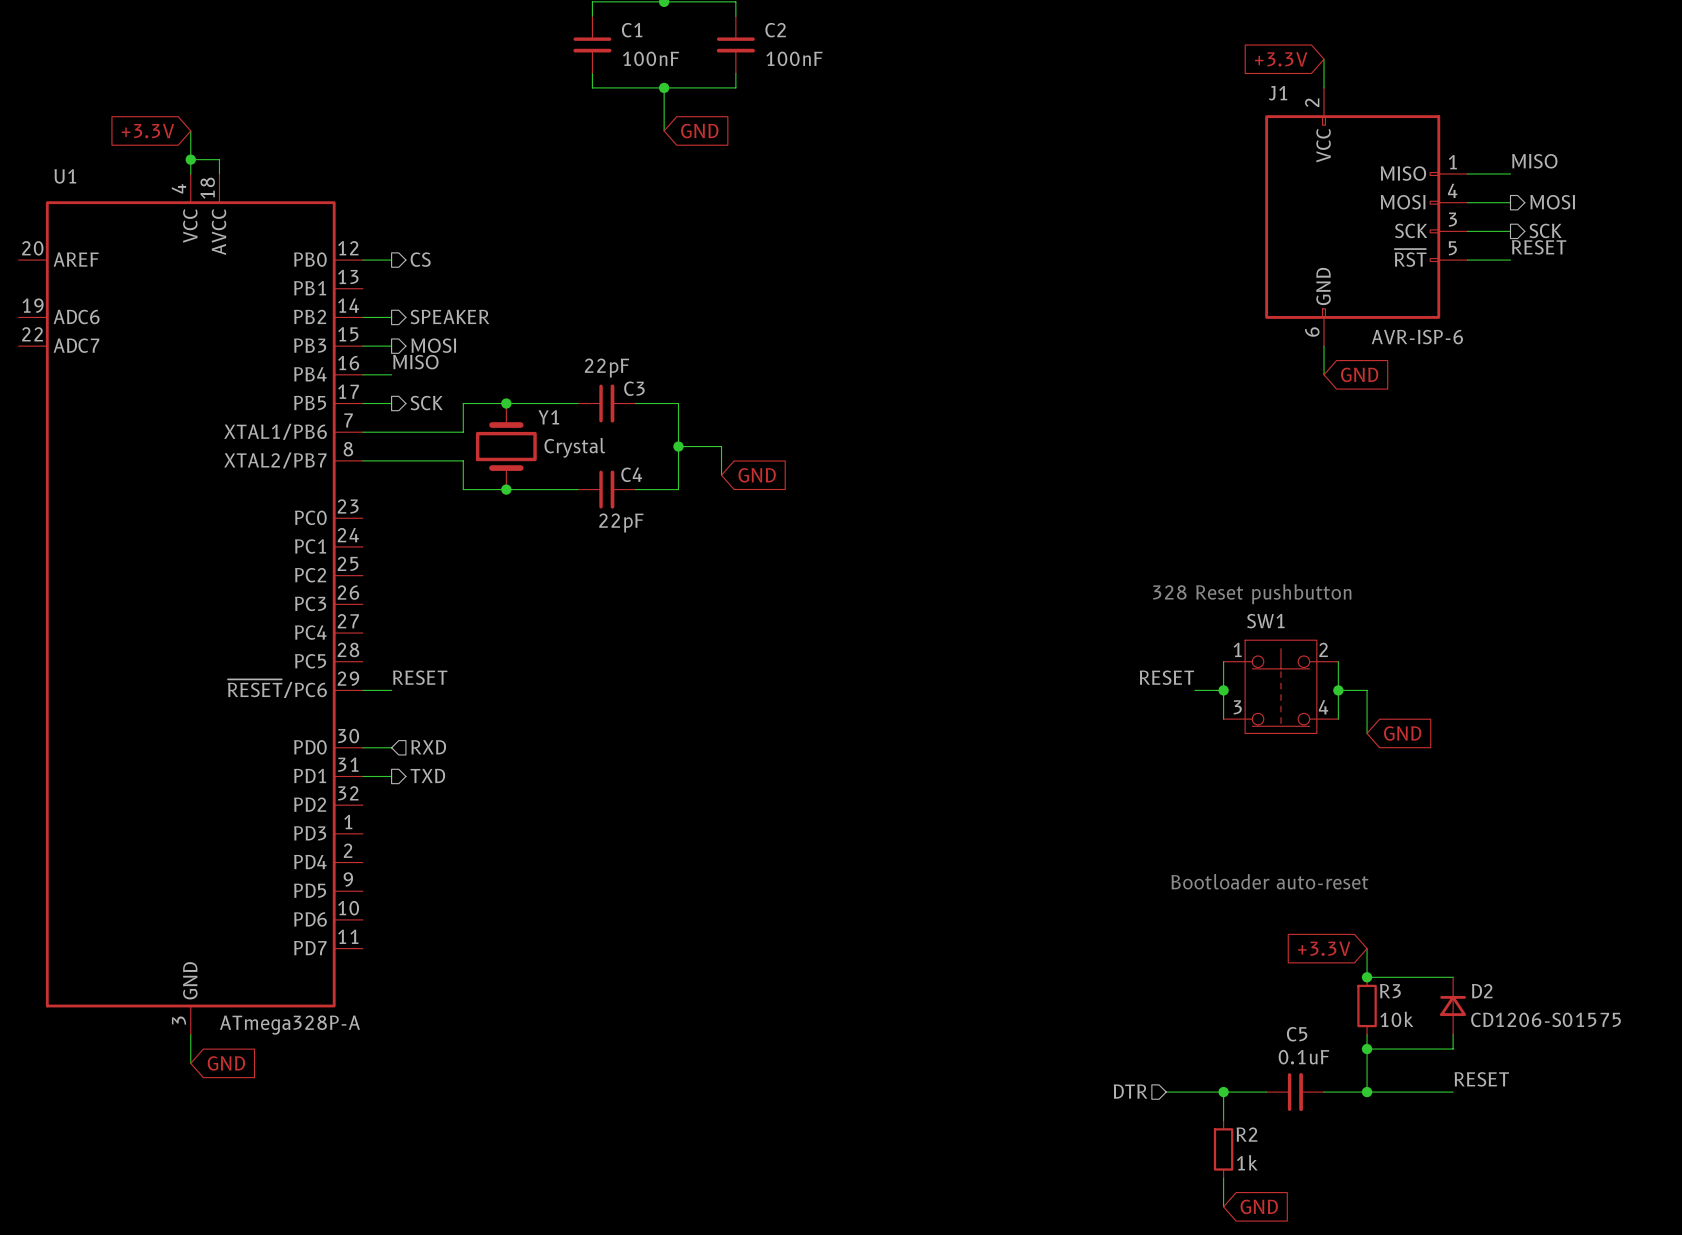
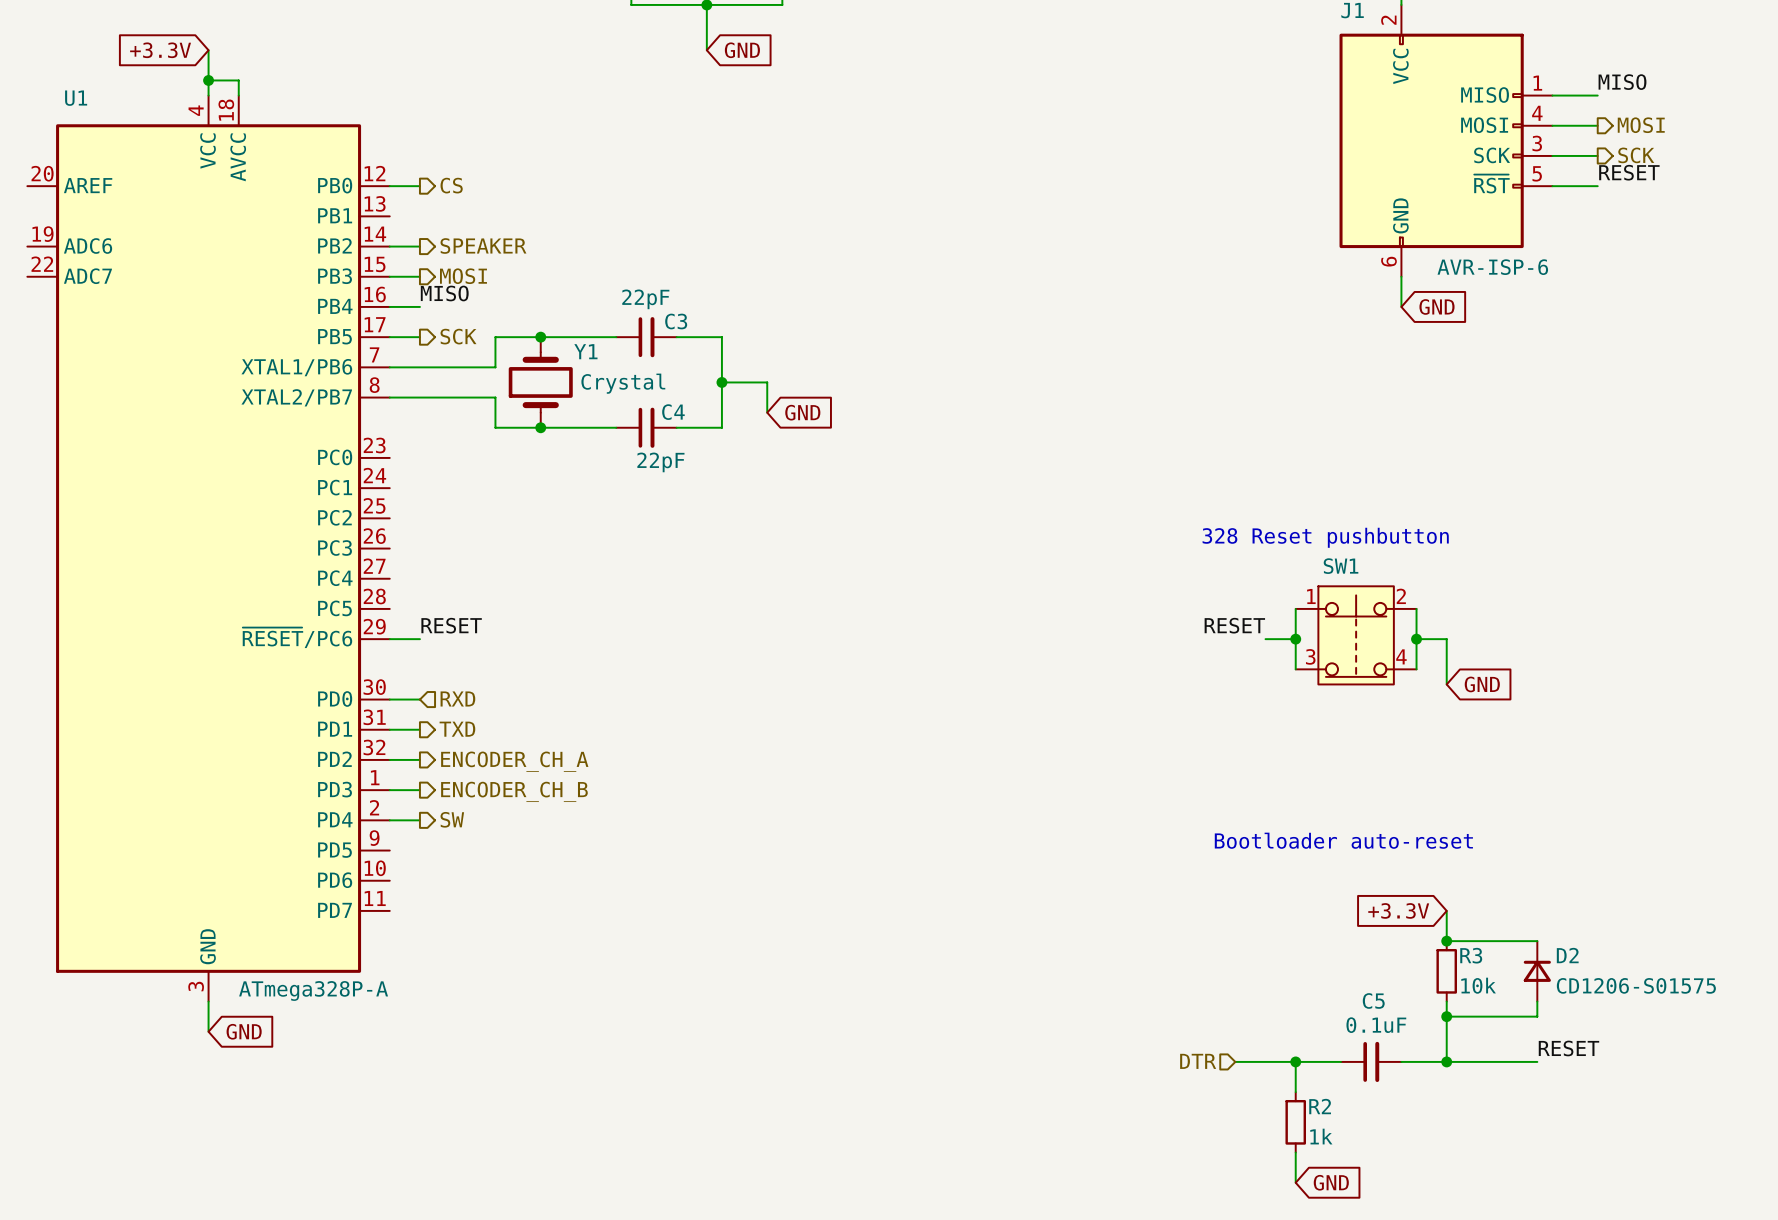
wire: none -> (389, 759) (419, 759)
hierarchical label: none -> ENCODER_CH_A (514, 761)
wire: none -> (389, 790) (419, 790)
hierarchical label: none -> ENCODER_CH_B (514, 791)
wire: none -> (389, 820) (419, 820)
hierarchical label: none -> SW (452, 819)

